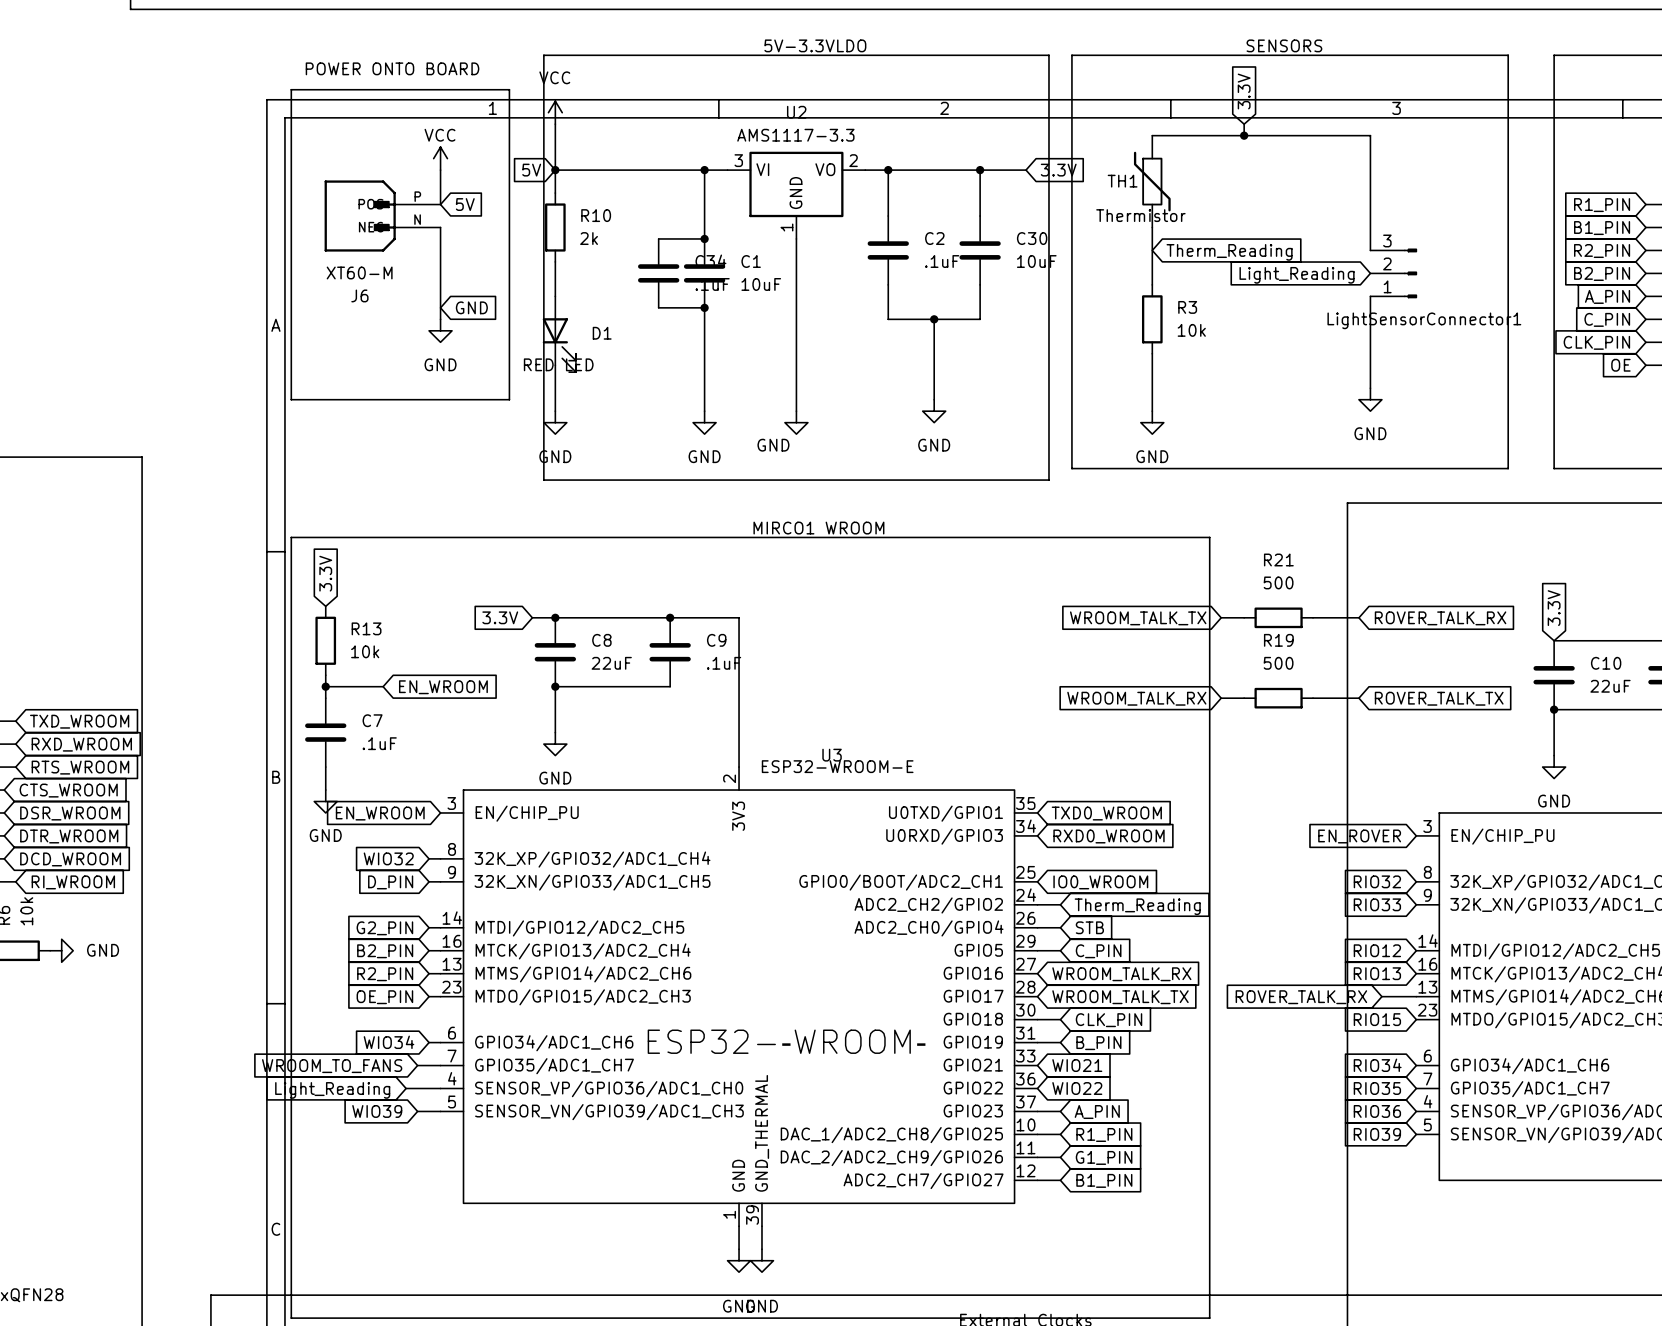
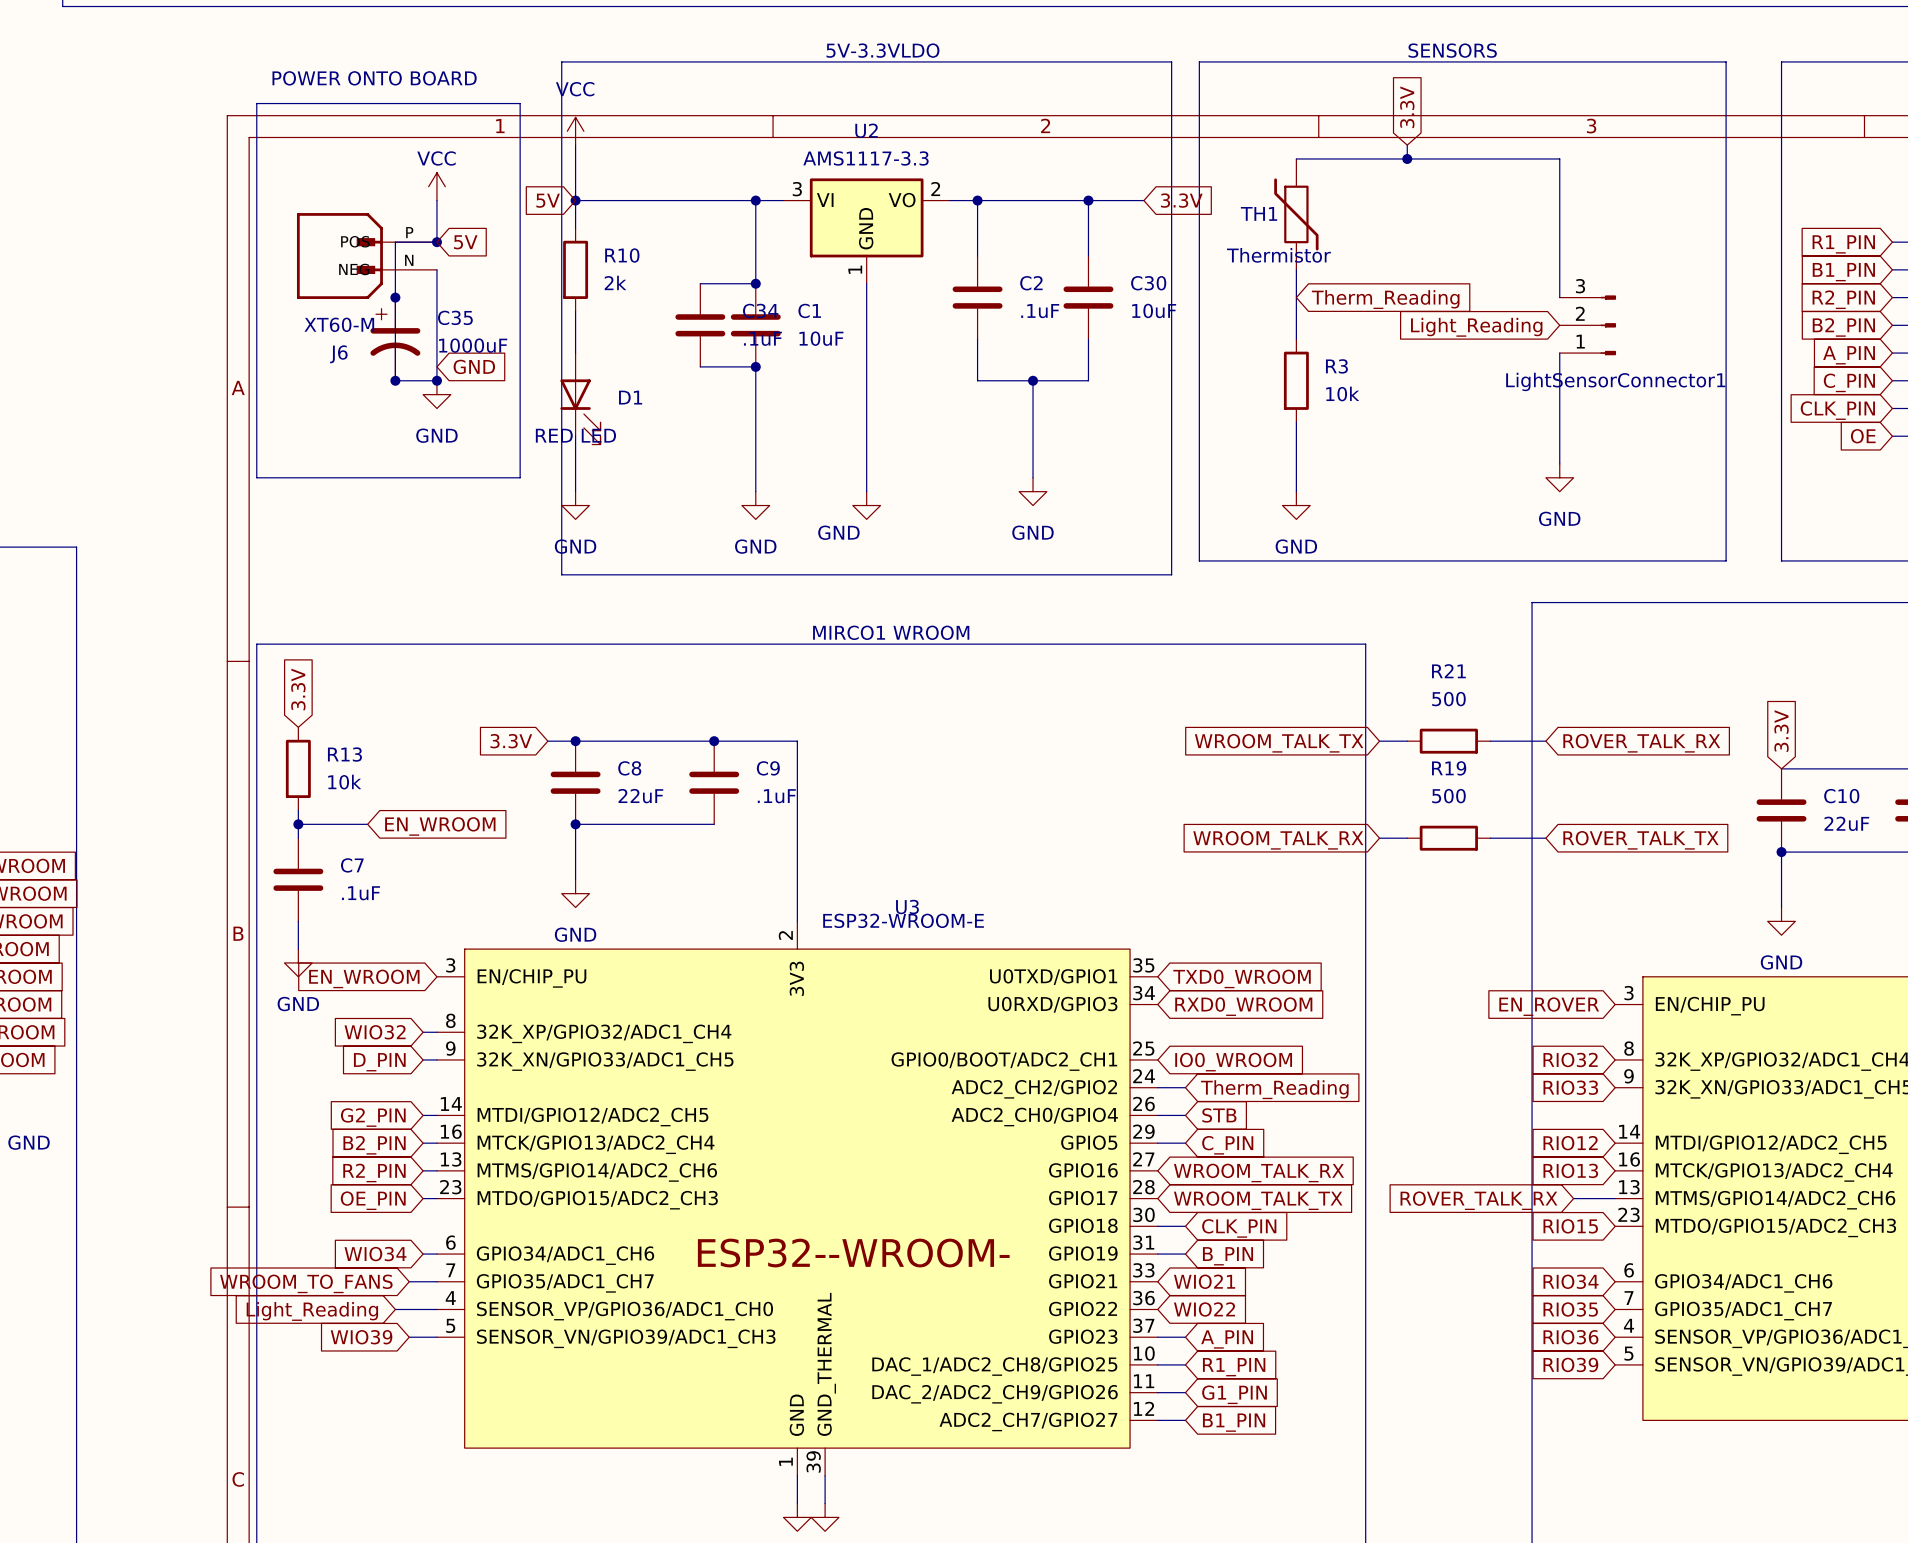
wire: none -> (436, 242) (395, 242) (395, 380) (436, 380)
junction: none -> (436, 242)
junction: none -> (395, 297)
C35: none -> 1000uF (395, 339)
junction: none -> (395, 380)
junction: none -> (436, 380)

